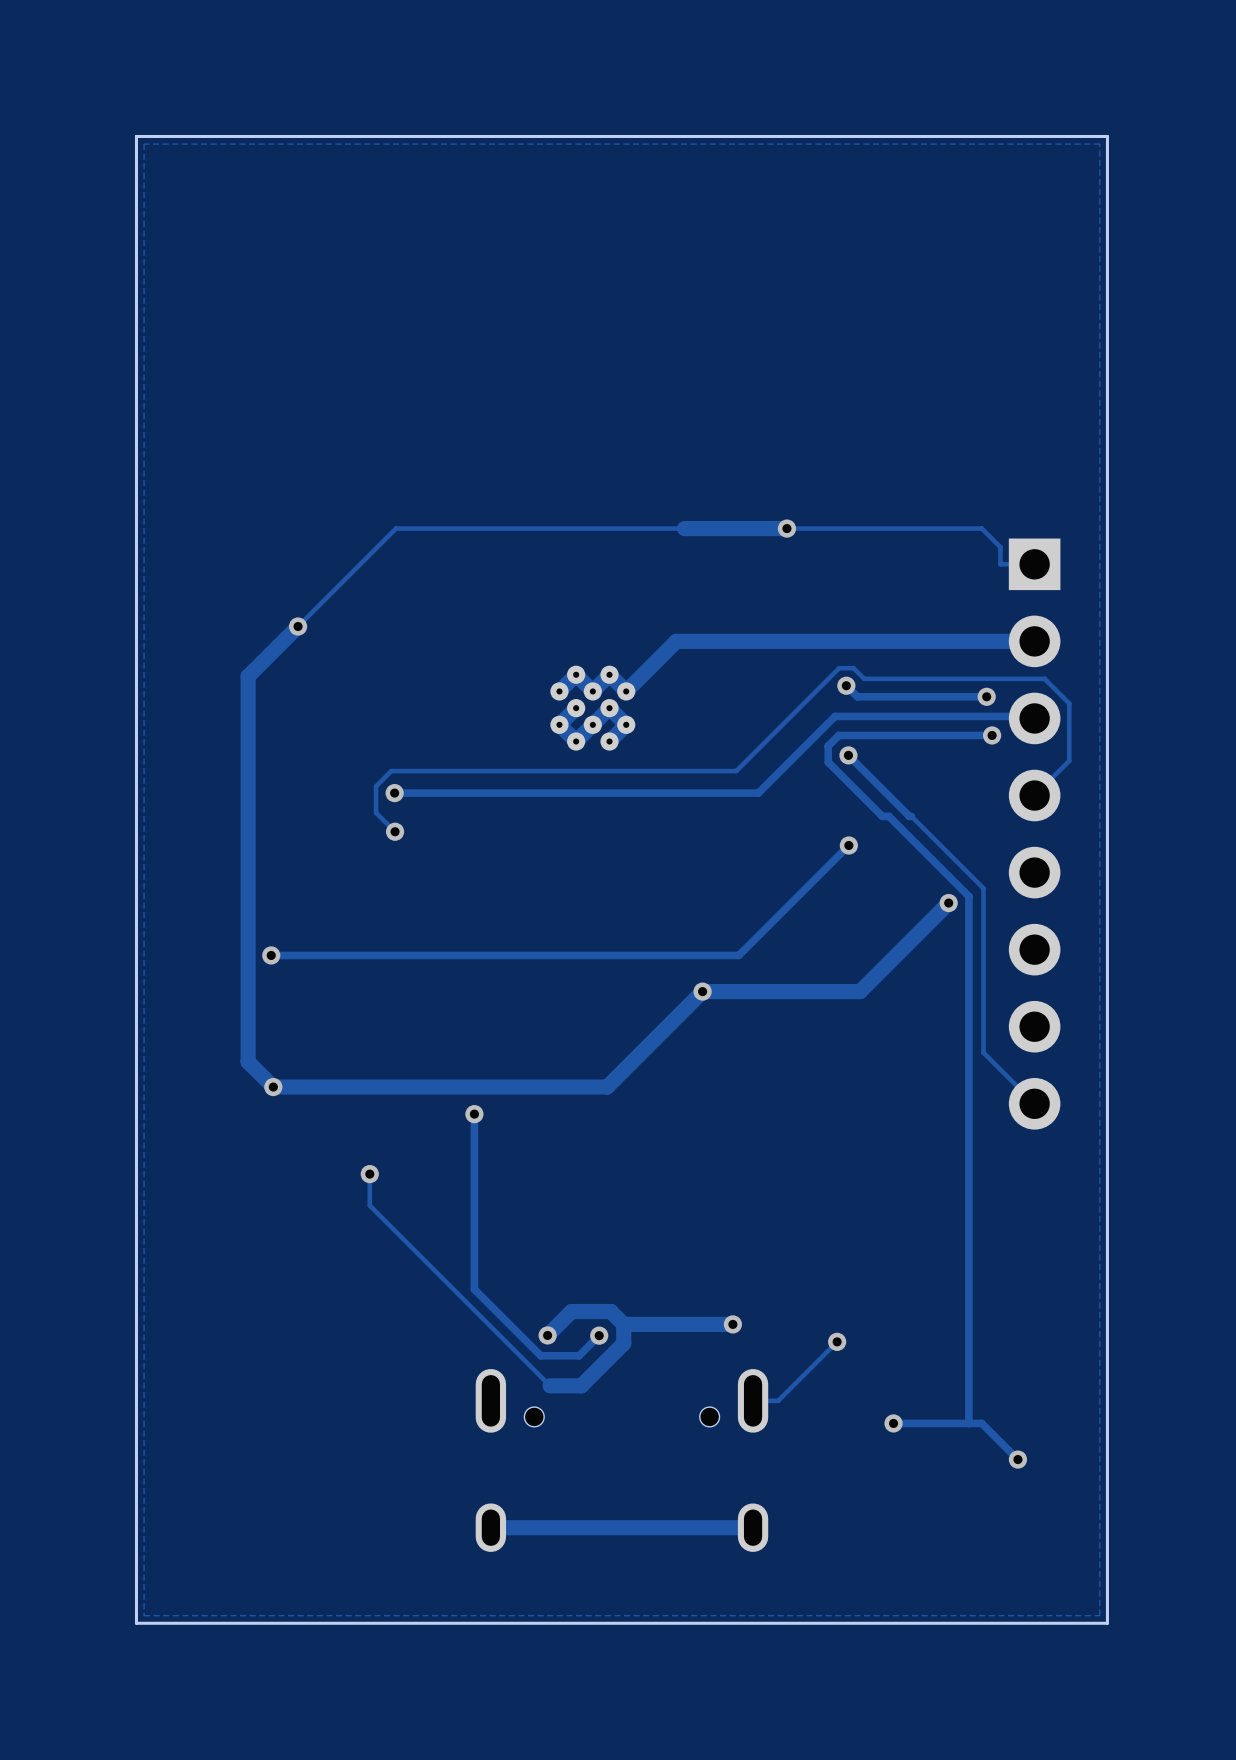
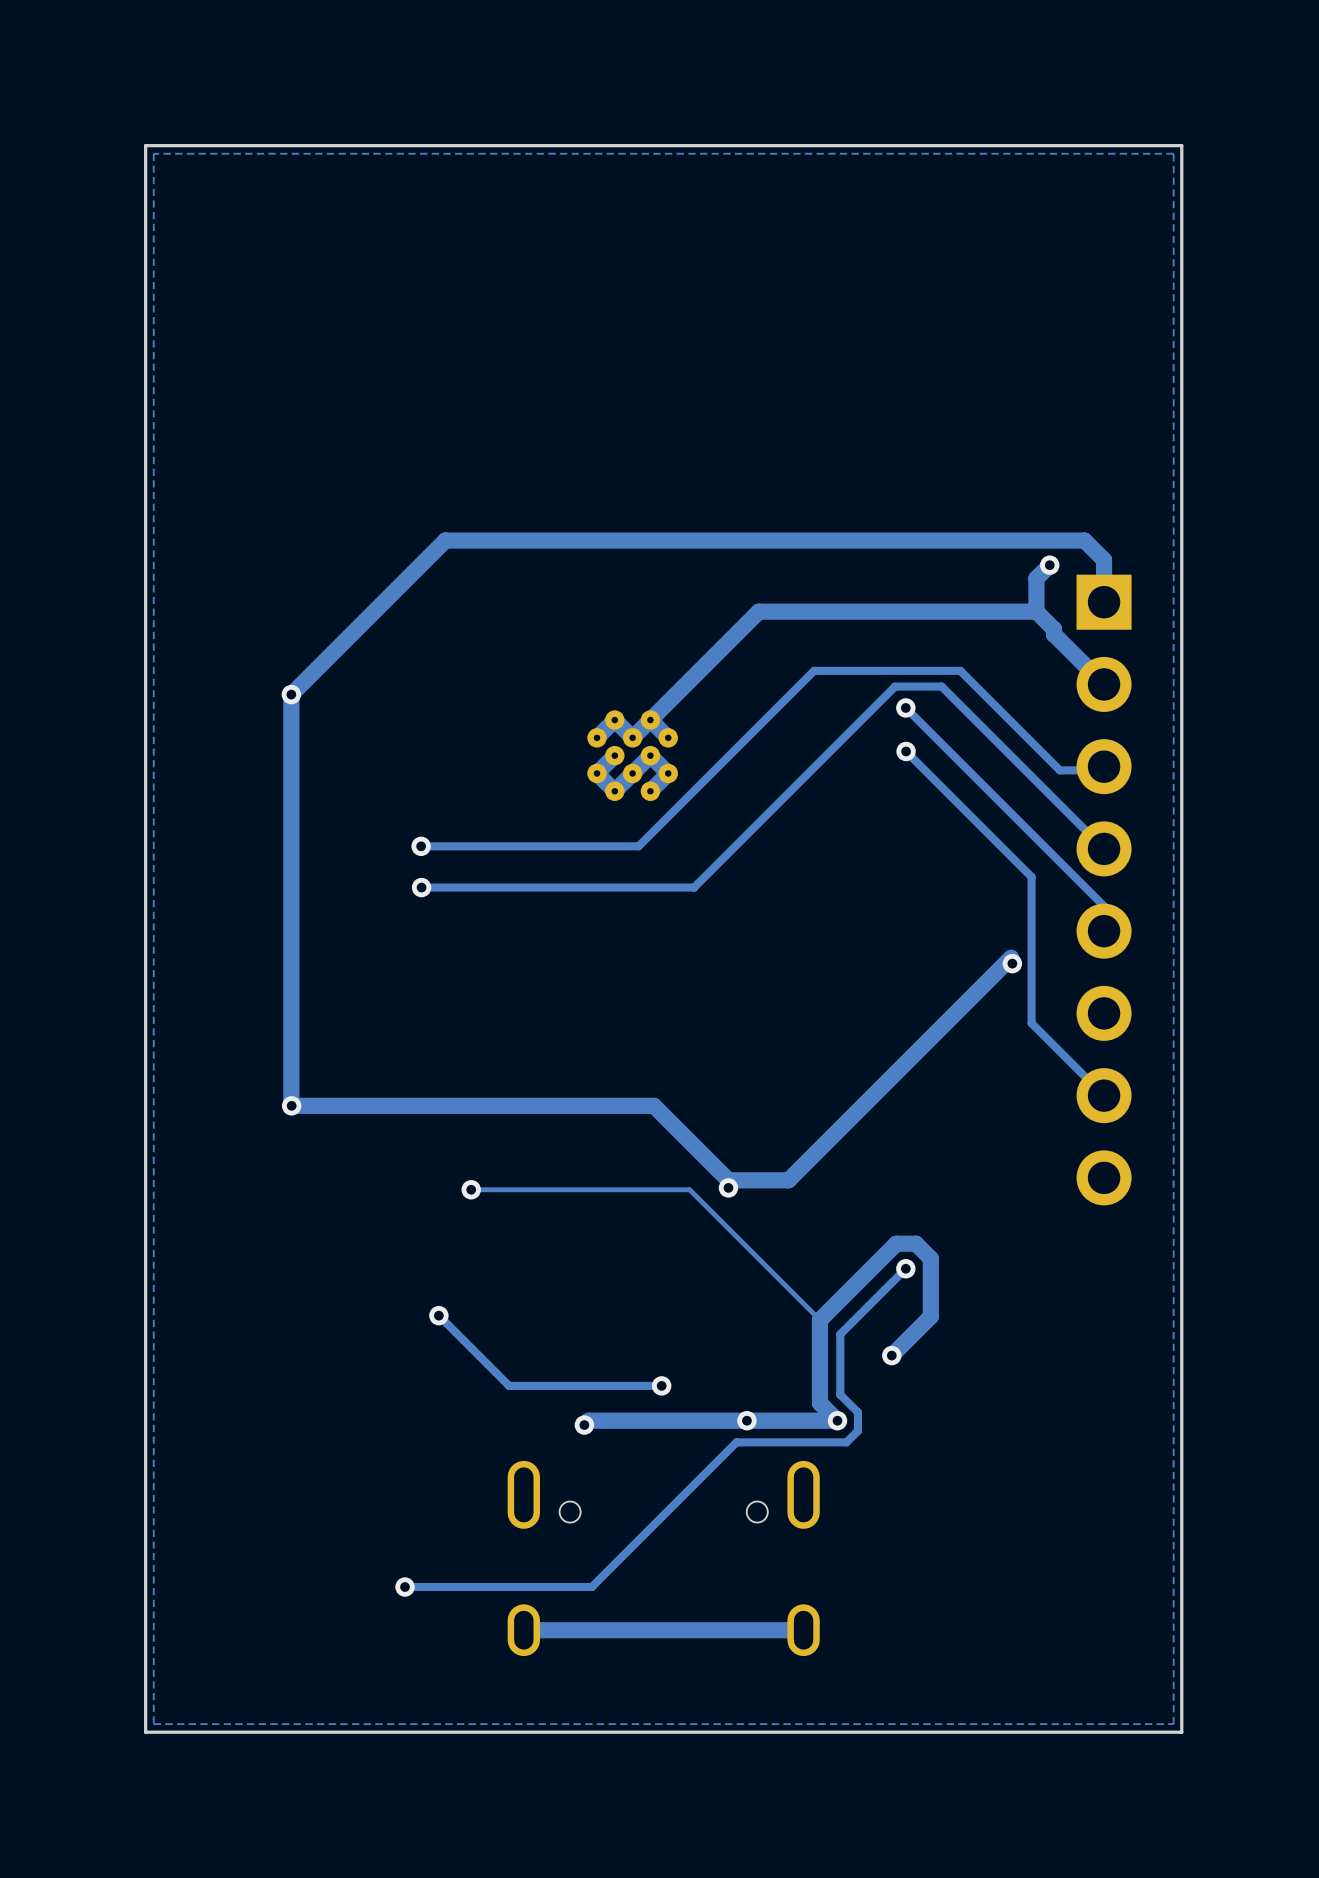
via: (786, 528) -> none
track: none -> (1049, 565) (1036, 578) (1036, 611)
via: none -> (1049, 565)
track: (1034, 564) (1000, 564) (1000, 547) (981, 528) (396, 528) (248, 676) (248, 1061) (273, 1087) (607, 1087) (702, 991) (860, 991) (948, 903) -> (1104, 602) (1104, 560) (1084, 540) (445, 540) (291, 694) (291, 1105)
track: none -> (1036, 611) (758, 611) (650, 720)
via position: (298, 626) -> (291, 694)
track: (1034, 641) (676, 641) (626, 691) -> (1104, 684) (1053, 634) (1053, 629) (1036, 611)
track: none -> (905, 707) (1104, 906) (1104, 931)
via: none -> (905, 707)
track: (853, 668) (839, 668) (736, 771) (391, 771) (376, 786) (376, 812) (395, 831) -> (1104, 848) (941, 686) (895, 686) (694, 887) (421, 887)
track: (864, 678) (1044, 678) (1069, 703) (1069, 760) (1034, 795) -> none
track: (846, 685) (857, 696) (986, 696) -> none
via: (846, 685) -> none
via: (986, 696) -> none
track: none -> (906, 751) (1031, 876) (1031, 1023) (1104, 1095)
via: none -> (906, 751)
track: (1034, 718) (1032, 716) (835, 716) (758, 793) (598, 793) -> (1104, 766) (1100, 770) (1059, 770) (960, 670) (814, 670) (638, 846)
track: (992, 735) (838, 735) (828, 746) (828, 762) (882, 816) (888, 816) (968, 896) (968, 1423) -> none
via: (992, 735) -> none
track: (848, 755) (983, 888) (983, 1052) (1034, 1103) -> none
via: (848, 755) -> none
track: (848, 845) (738, 955) (271, 955) -> none
via: (848, 845) -> none
track: none -> (1011, 957) (788, 1180) (728, 1180)
via: (271, 955) -> none
via: (702, 991) -> none
track: none -> (291, 1105) (653, 1105) (728, 1180)
via: none -> (291, 1105)
via: (273, 1087) -> none
via: none -> (728, 1187)
track: none -> (471, 1189) (689, 1189) (819, 1320)
track: (474, 1114) (474, 1289) (540, 1355) (579, 1355) (599, 1335) -> none
via position: (474, 1114) -> (471, 1189)
track: (369, 1174) (369, 1205) (550, 1385) (581, 1385) (623, 1343) (623, 1324) -> none
via: (369, 1174) -> none
track: none -> (905, 1268) (840, 1334) (840, 1394) (857, 1412) (857, 1430) (846, 1442) (736, 1442) (591, 1587) (405, 1587)
via: none -> (905, 1268)
track: none -> (438, 1315) (509, 1385) (661, 1385)
via: none -> (438, 1315)
track: none -> (819, 1320) (896, 1243) (915, 1243) (930, 1258) (930, 1316) (891, 1355)
via: none -> (891, 1355)
track: (623, 1324) (610, 1311) (571, 1311) (551, 1331) -> (819, 1320) (819, 1403) (837, 1420) (588, 1420)
track: (732, 1324) (623, 1324) -> none
via: (732, 1324) -> none
via: none -> (746, 1420)
via: none -> (837, 1420)
via position: (599, 1335) -> (661, 1385)
track: (837, 1341) (778, 1400) (753, 1400) -> none
via: (837, 1341) -> none
track: (893, 1423) (981, 1423) (1017, 1459) -> none
via: (893, 1423) -> none
via: (1017, 1459) -> none
via: none -> (405, 1587)

